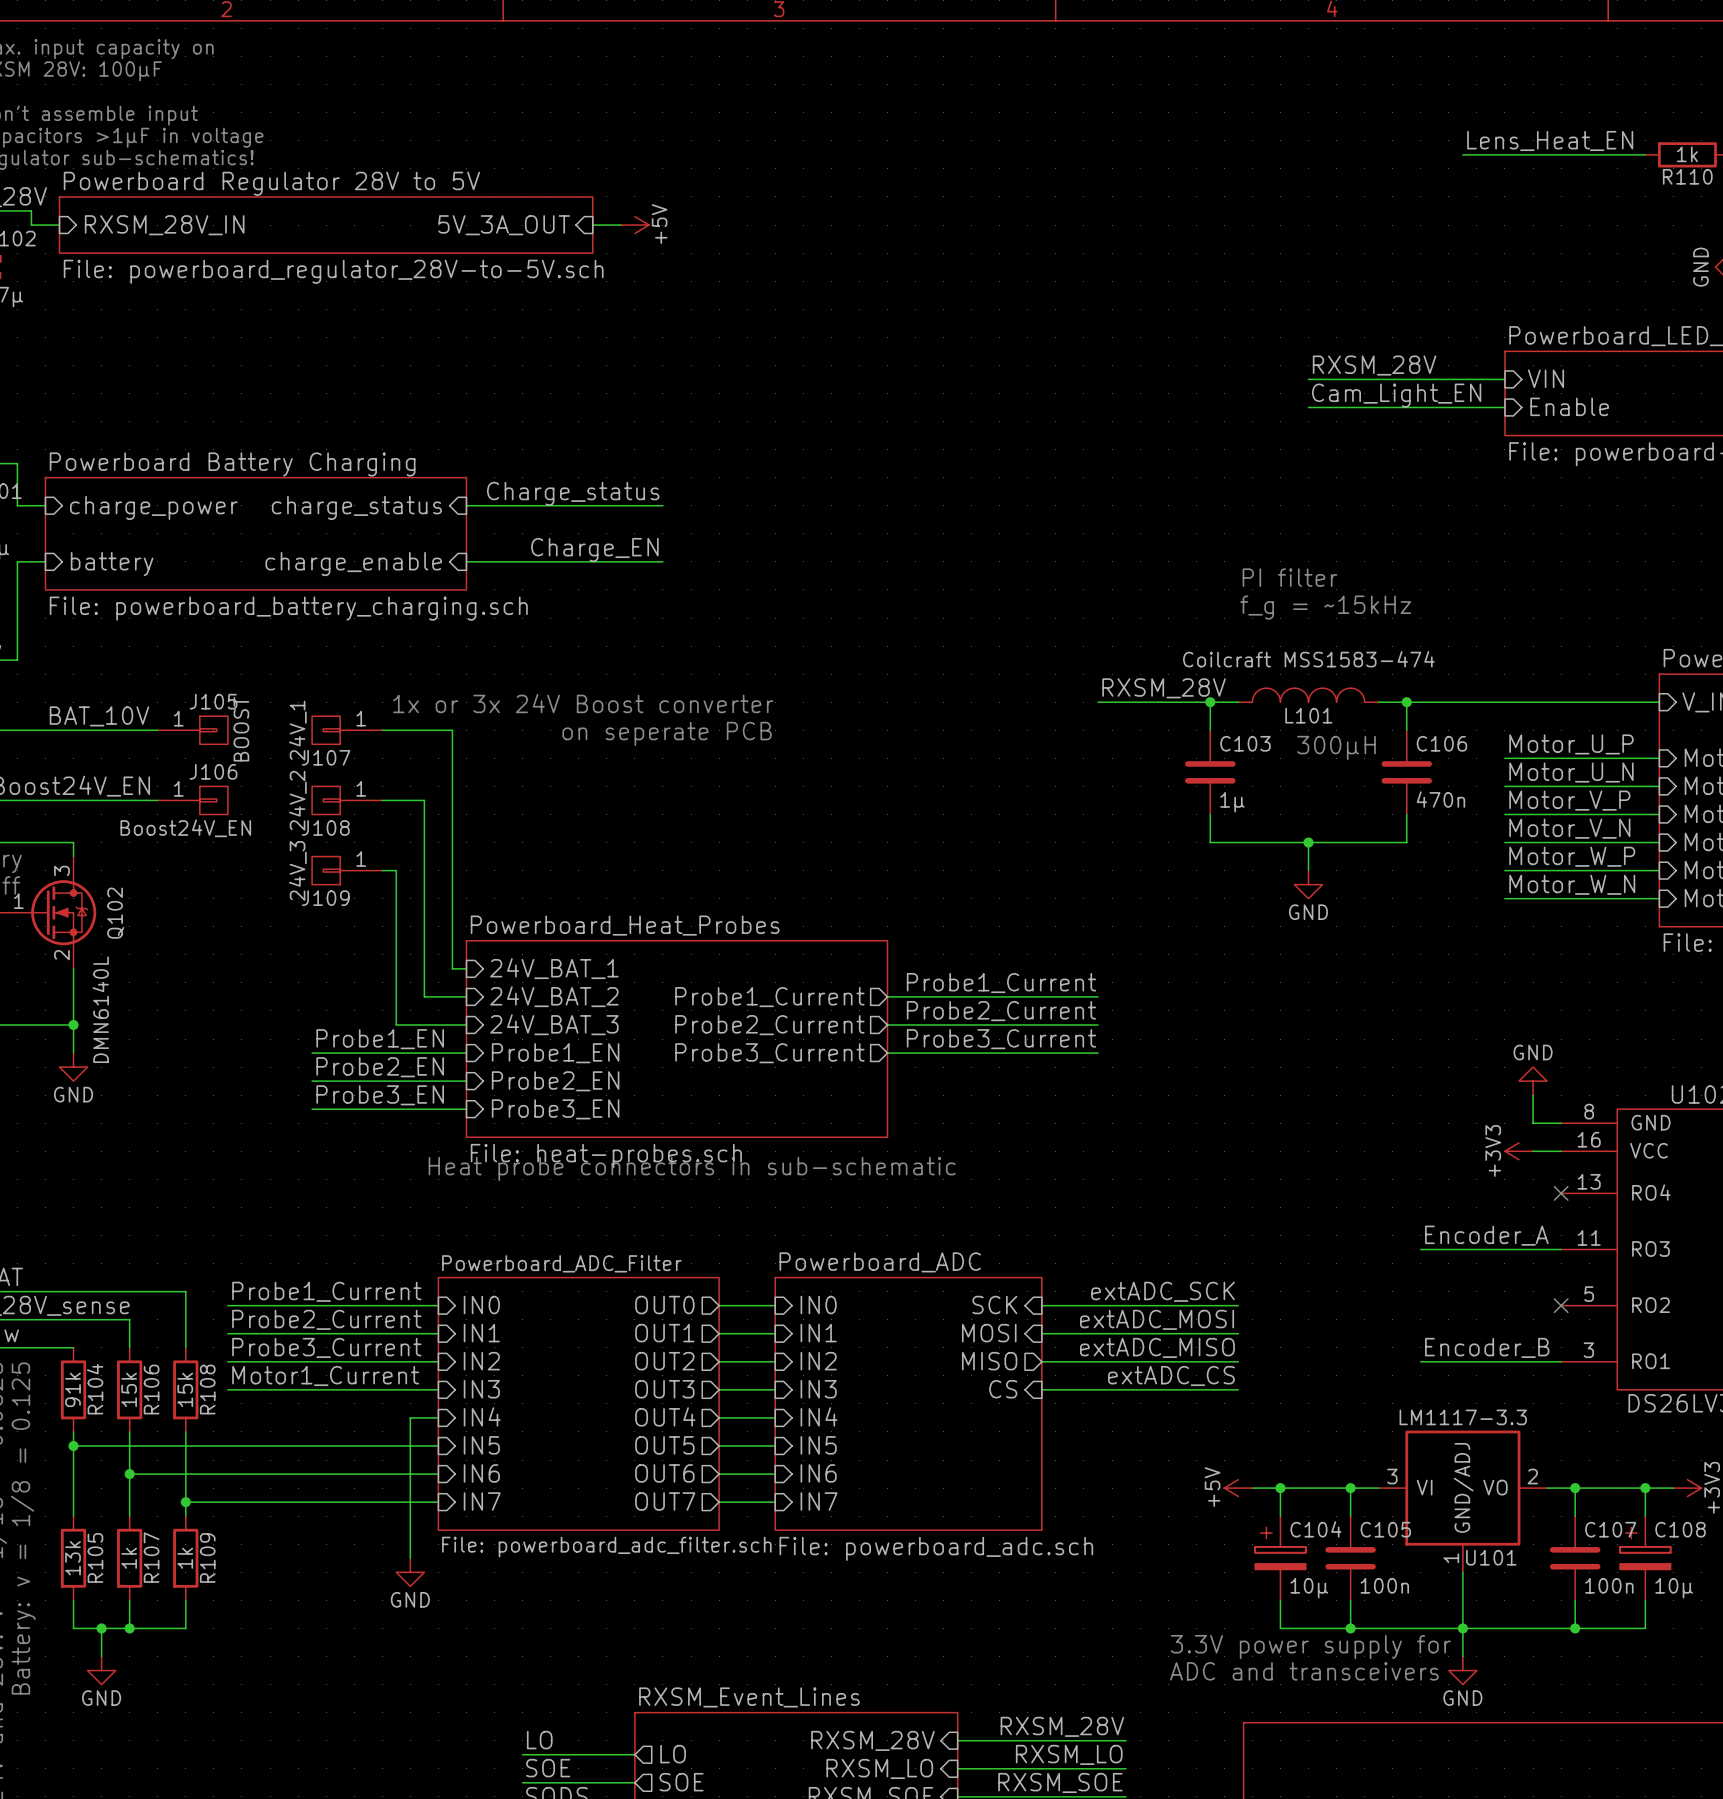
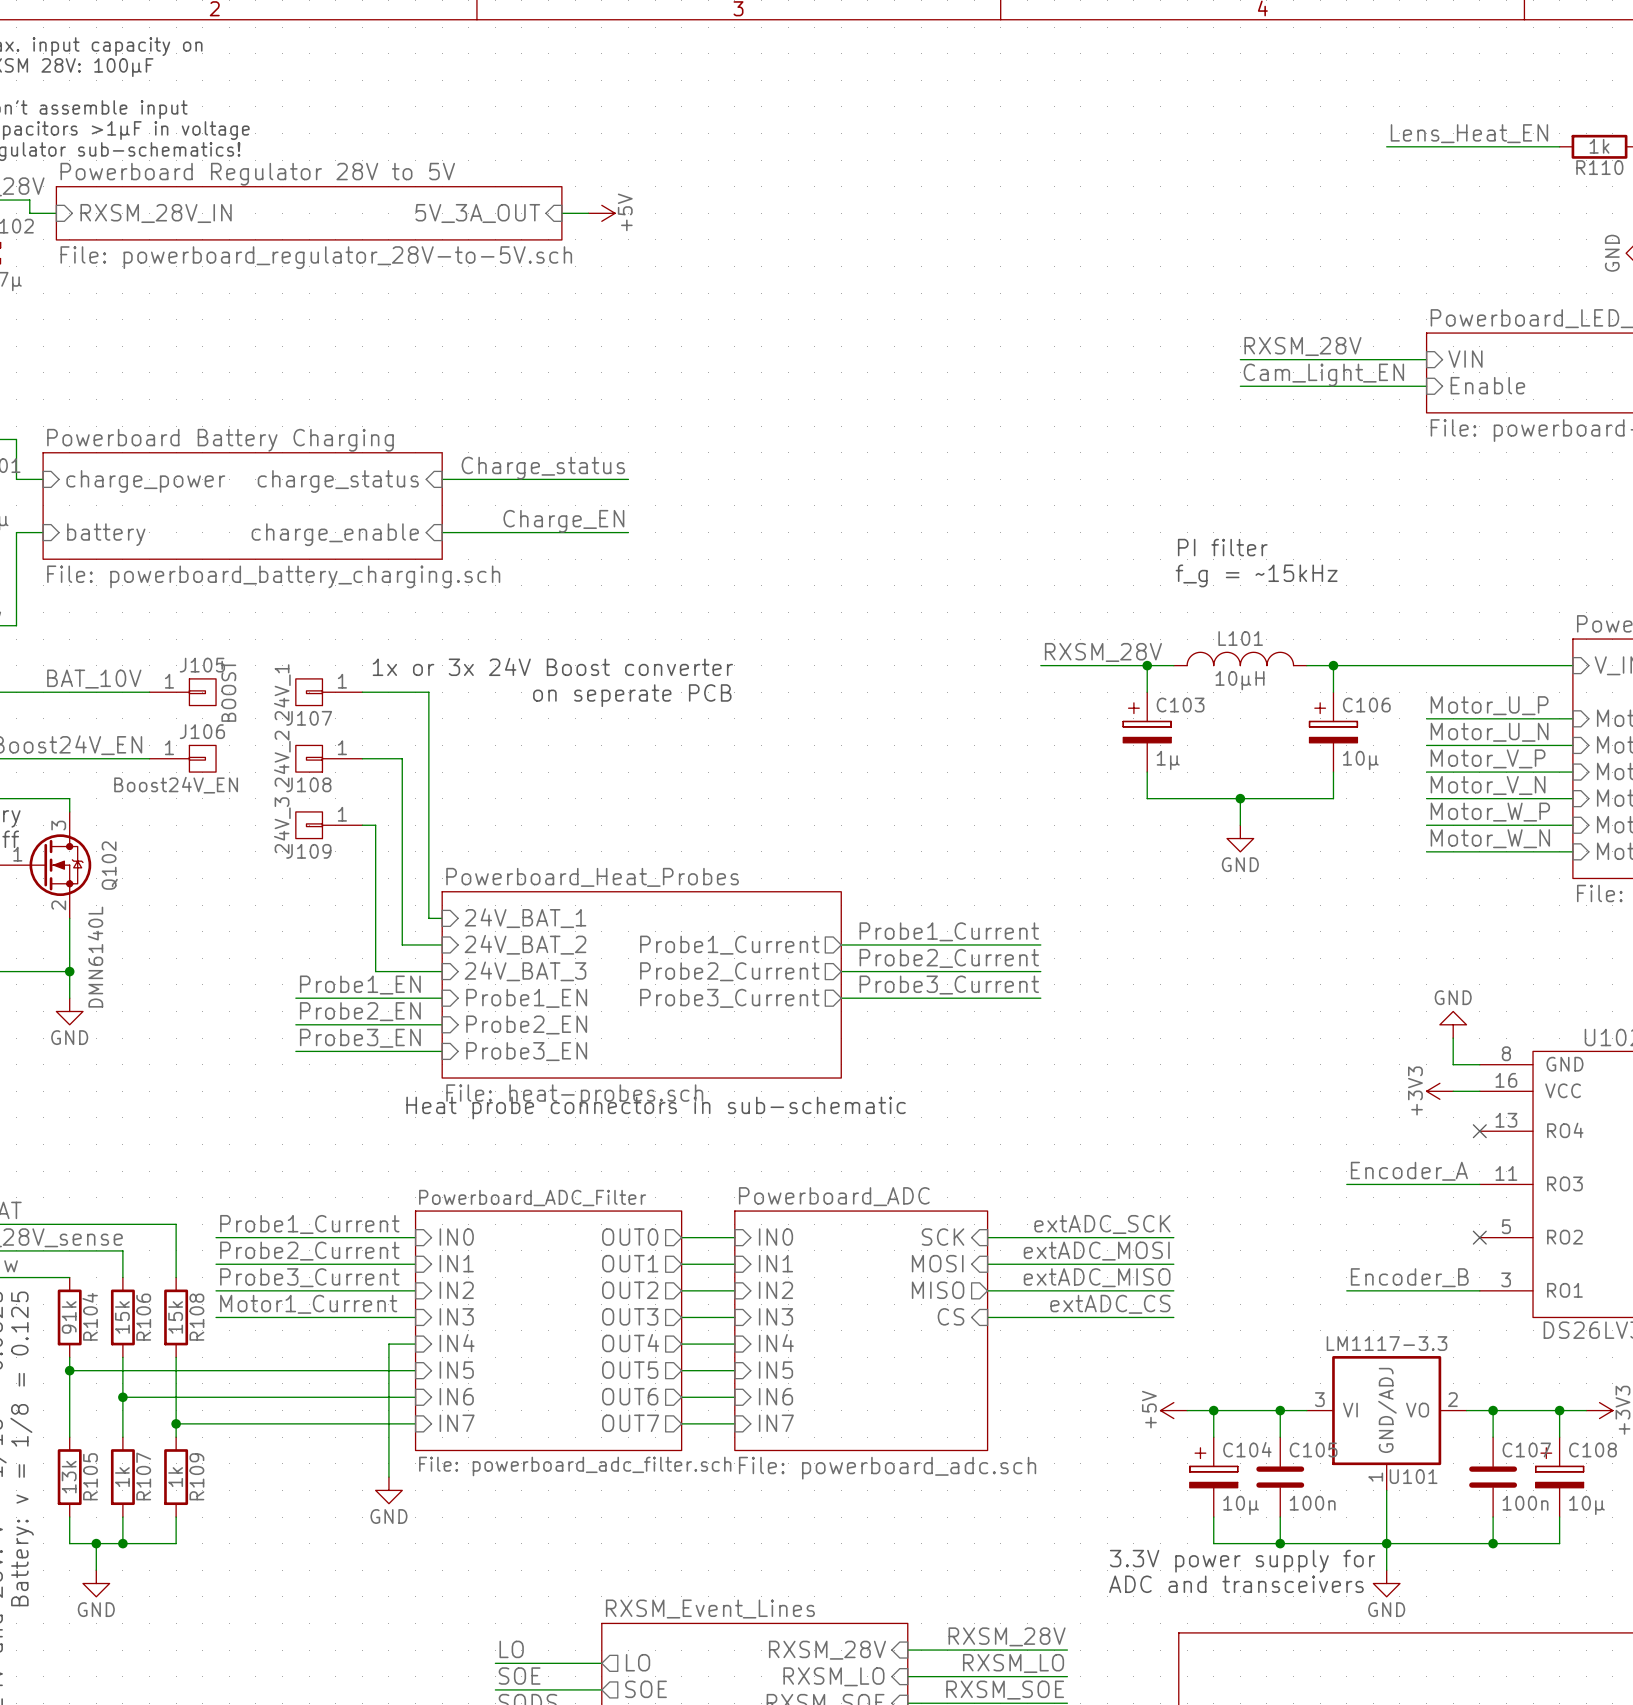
L101 value: Coilcraft MSS1583-474 (1308, 659) -> 10µH (1240, 680)
L101 name position: L101 (1308, 715) -> L101 (1240, 638)
C103 symbol: [1185, 730, 1236, 815] -> [1123, 692, 1172, 773]
C106 symbol: [1381, 730, 1433, 815] -> [1309, 692, 1358, 773]
text: 300µH (1336, 747) -> none
C106 value: 470n (1440, 799) -> 10µ (1360, 760)

